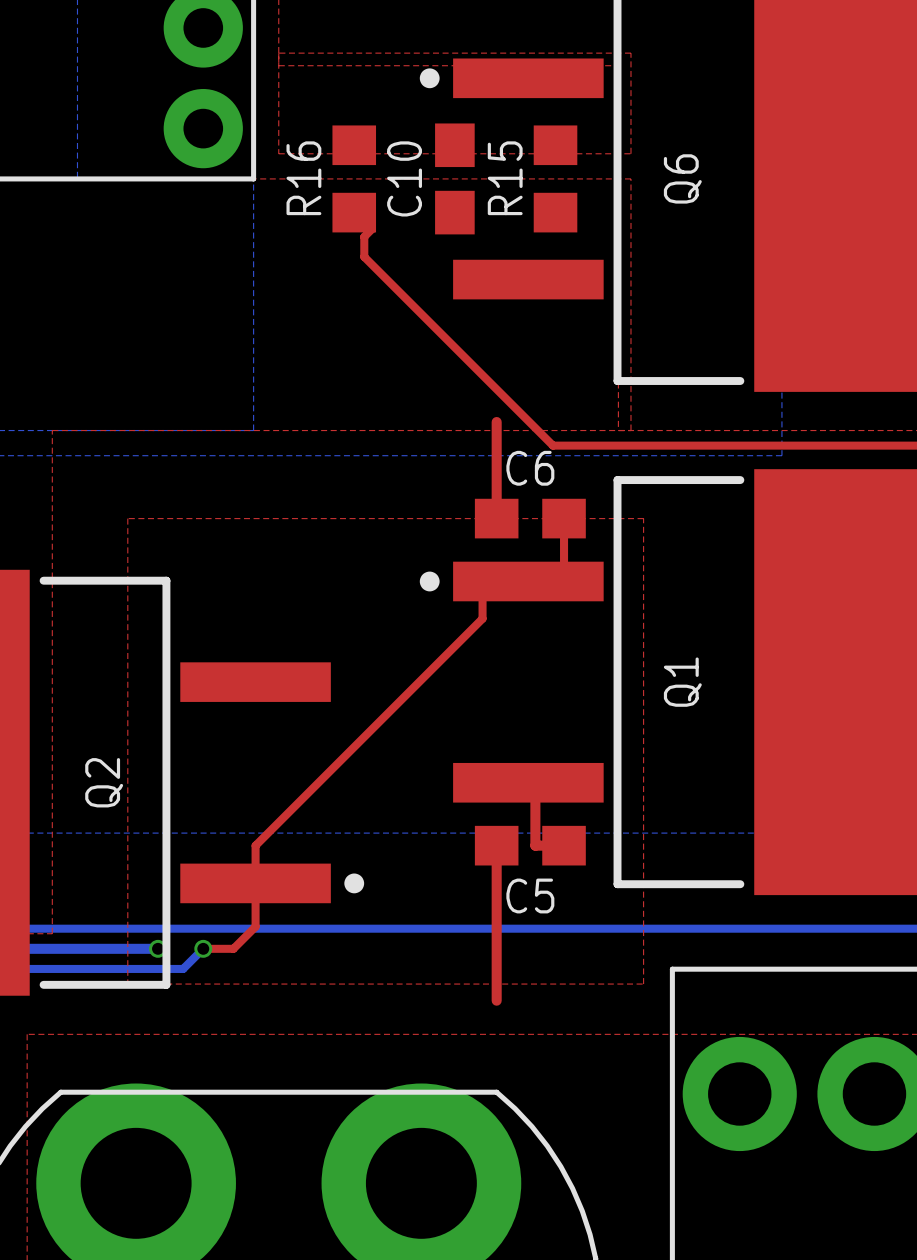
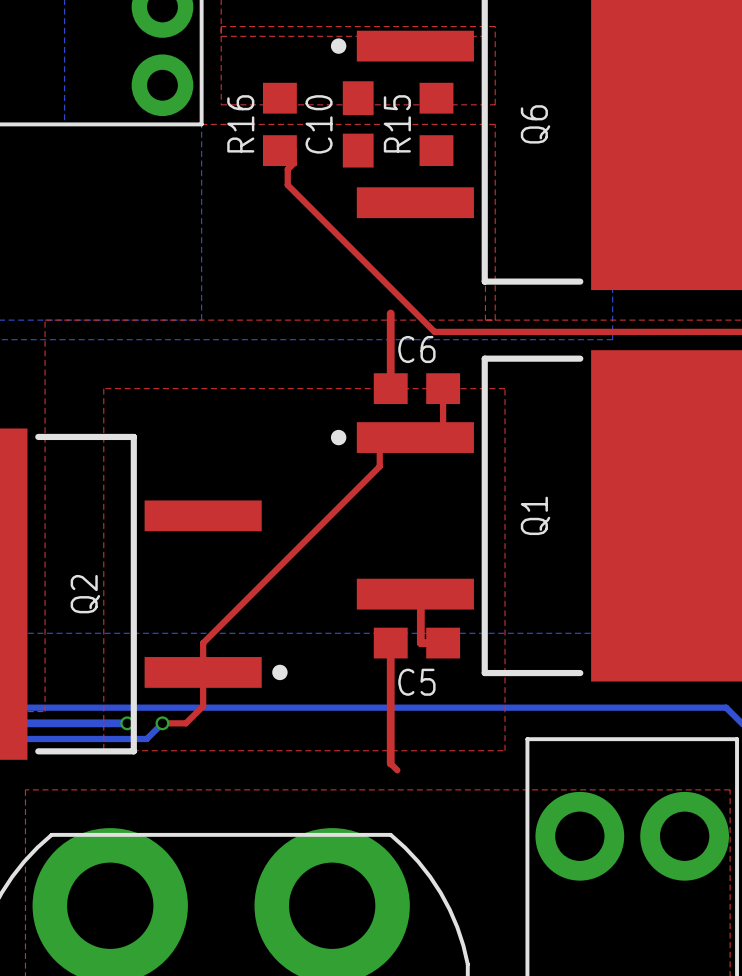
top track: none -> (390, 763) (397, 770)

